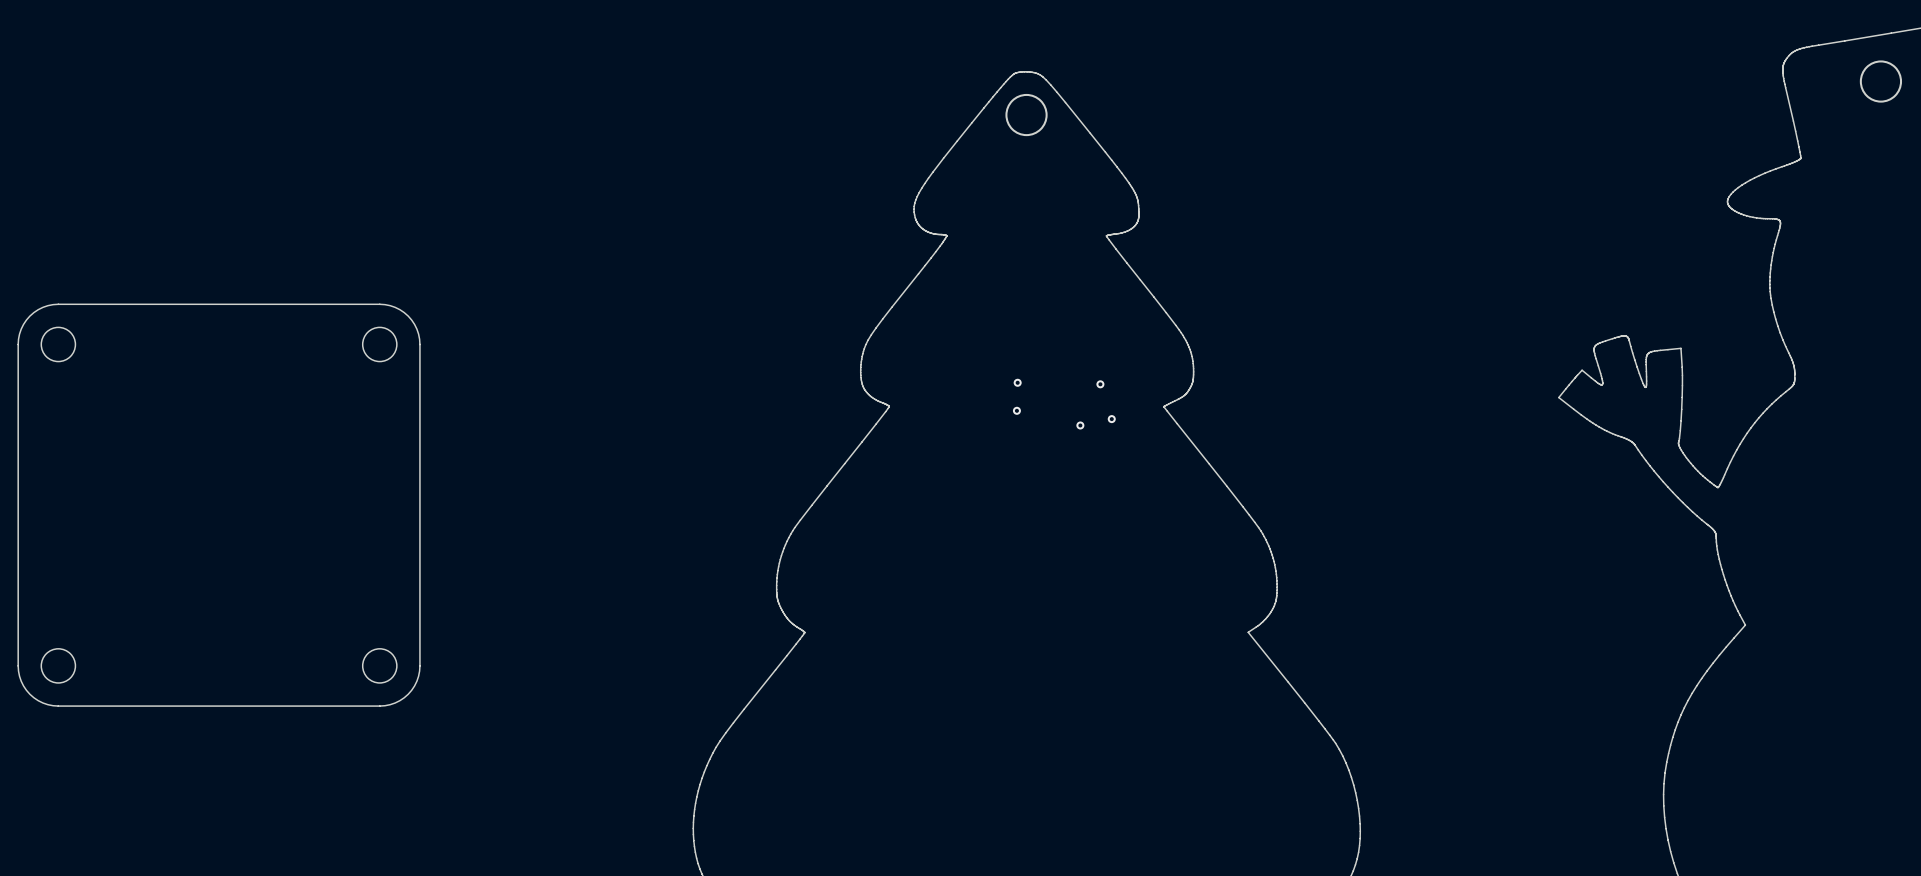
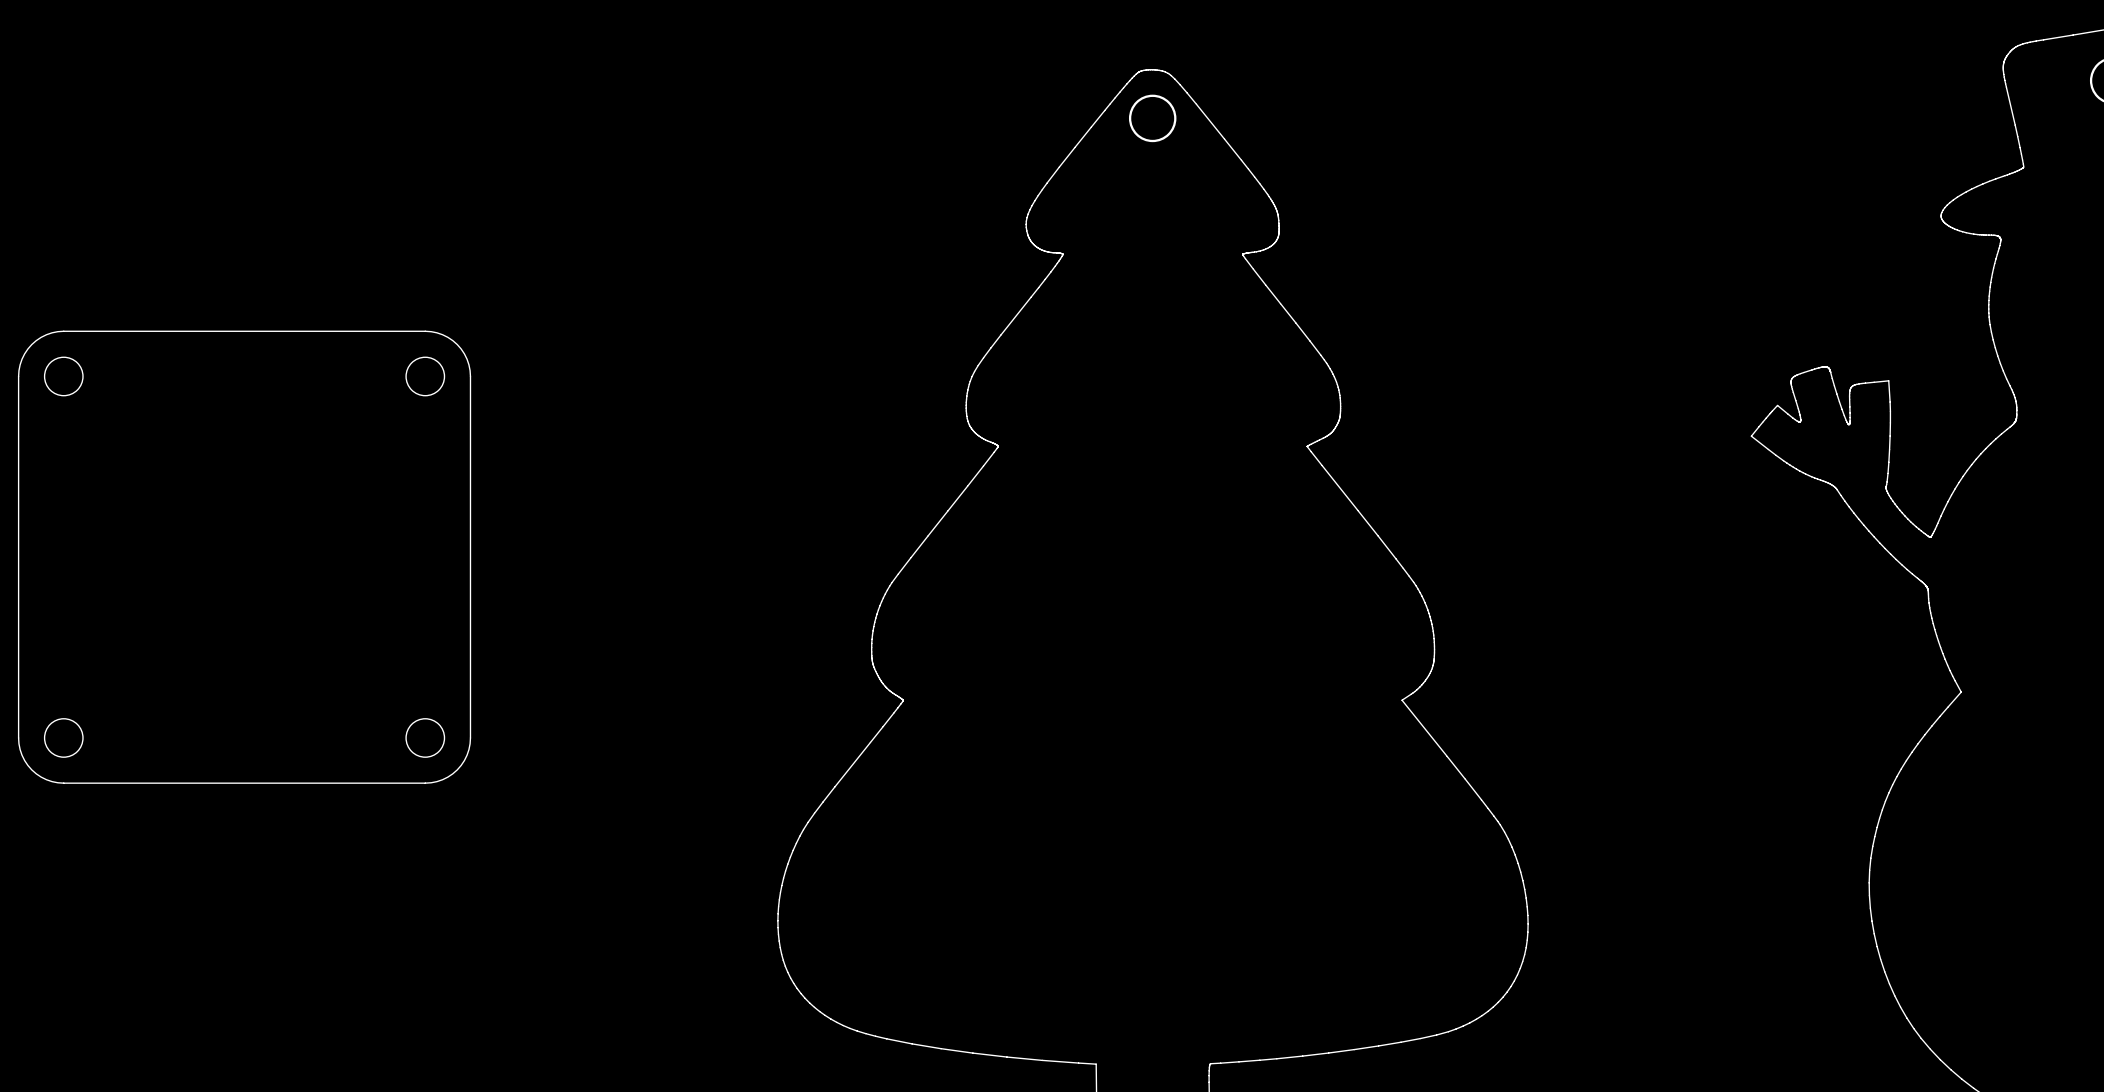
via: (1017, 382) -> none
via: (1100, 384) -> none
via: (1016, 410) -> none
via: (1111, 419) -> none
via: (1080, 425) -> none

